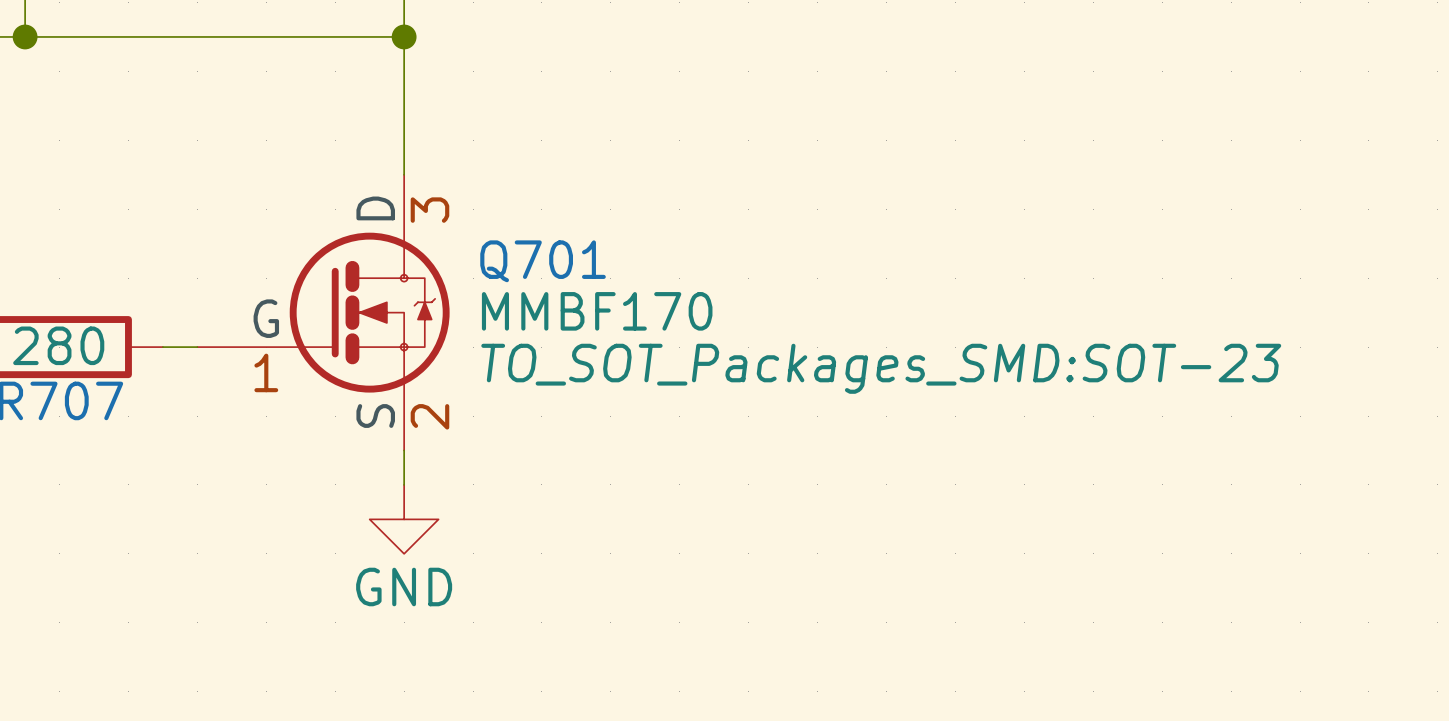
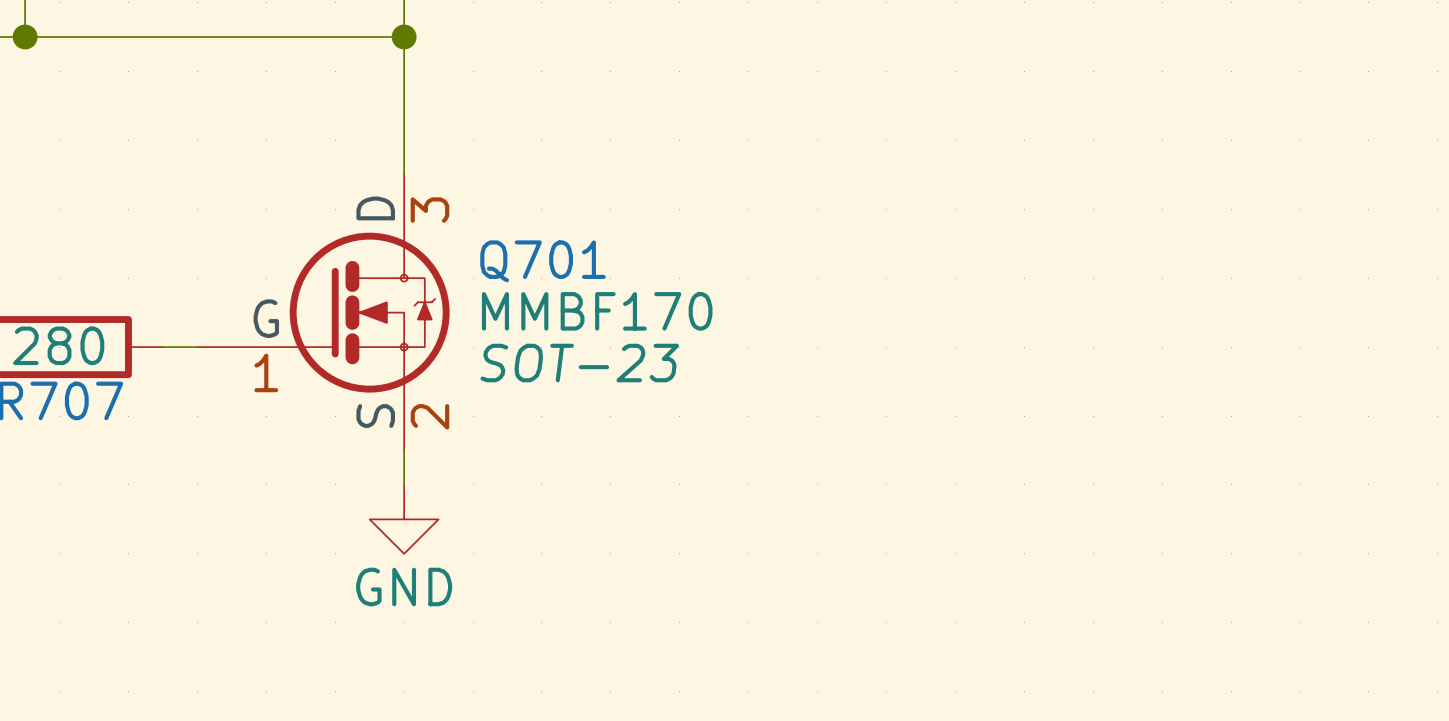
Q701 text: TO_SOT_Packages_SMD:SOT-23 (881, 368) -> SOT-23 (579, 363)

